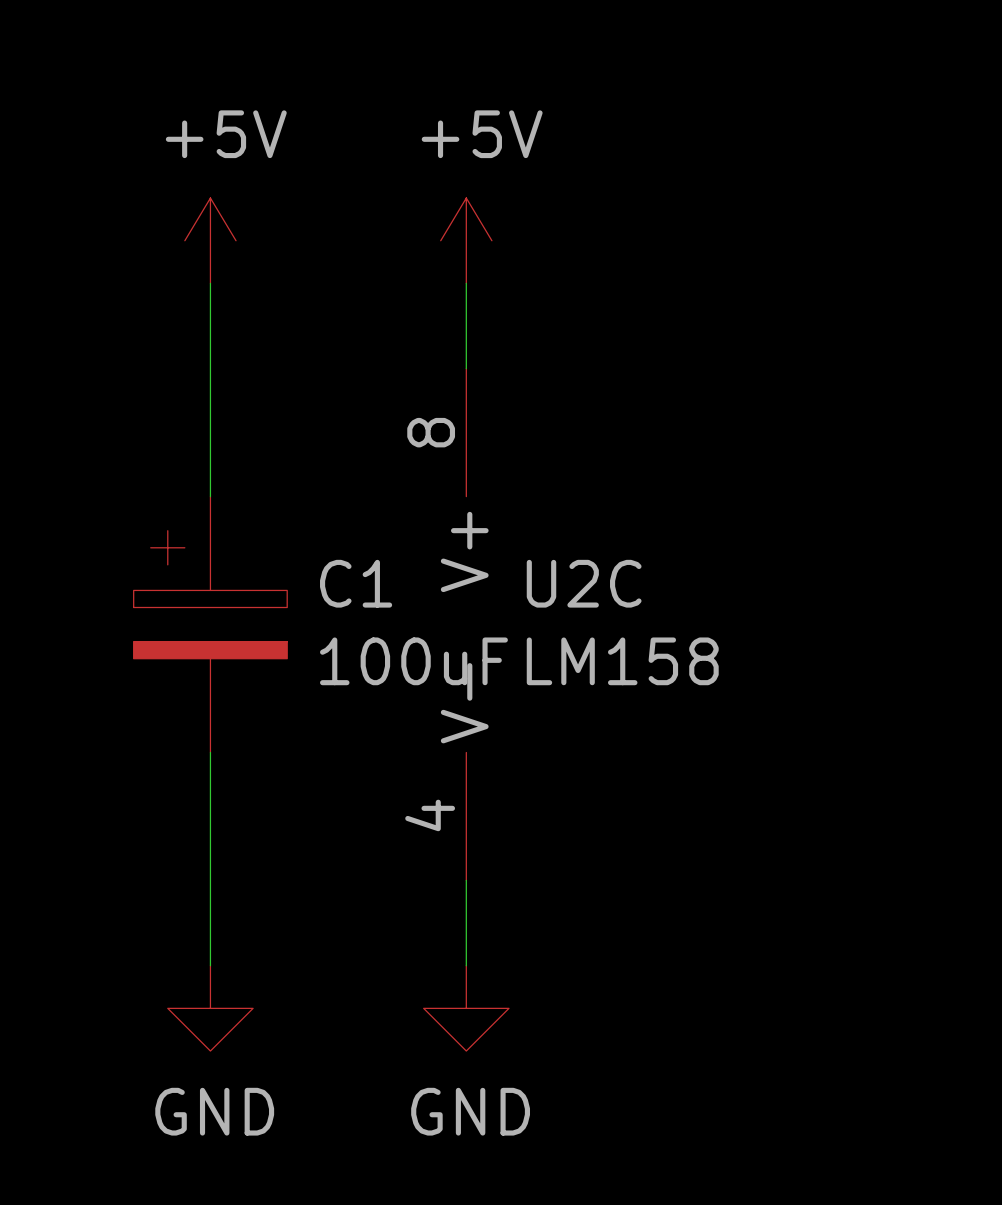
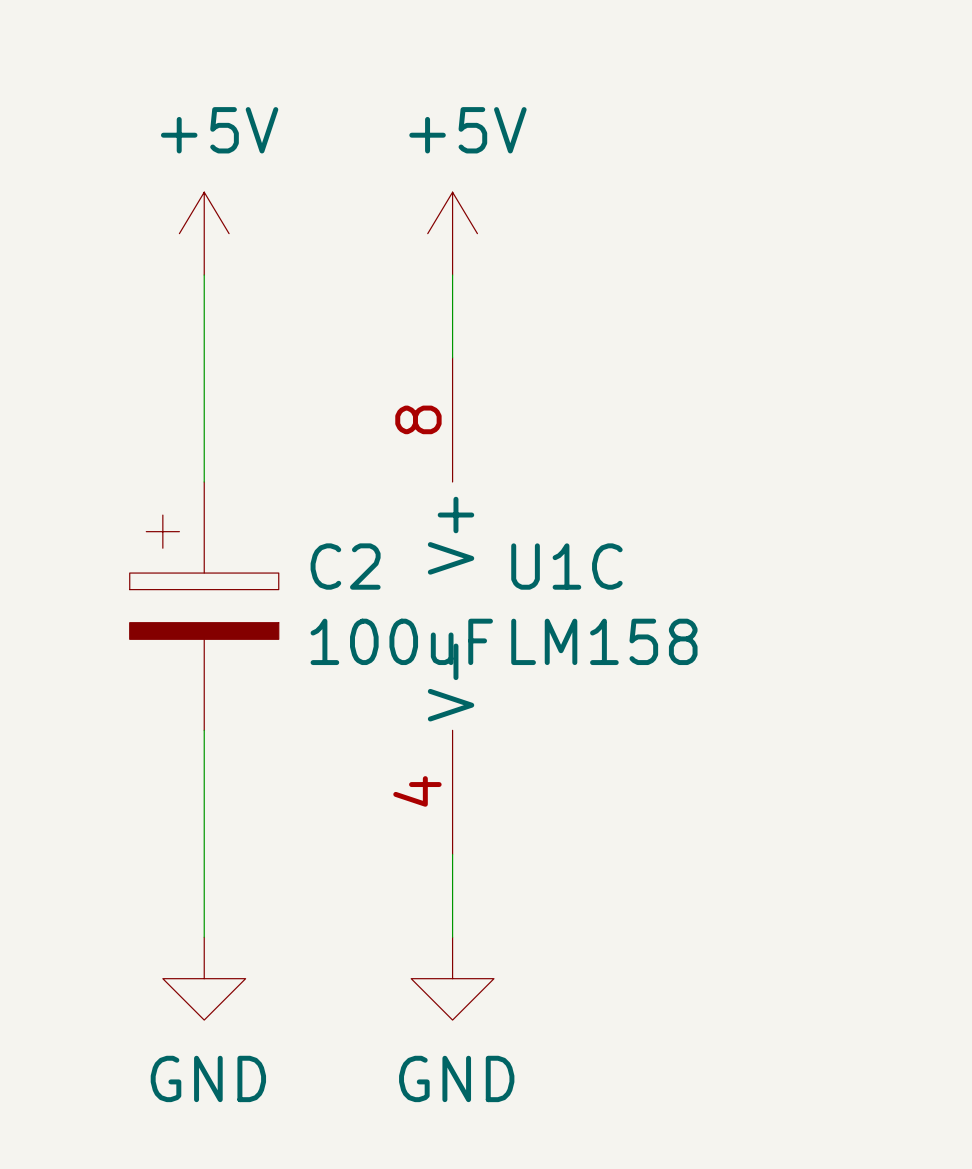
C1 name: C1 (356, 583) -> C2 (345, 566)
U2C name: U2C (584, 583) -> U1C (566, 566)

